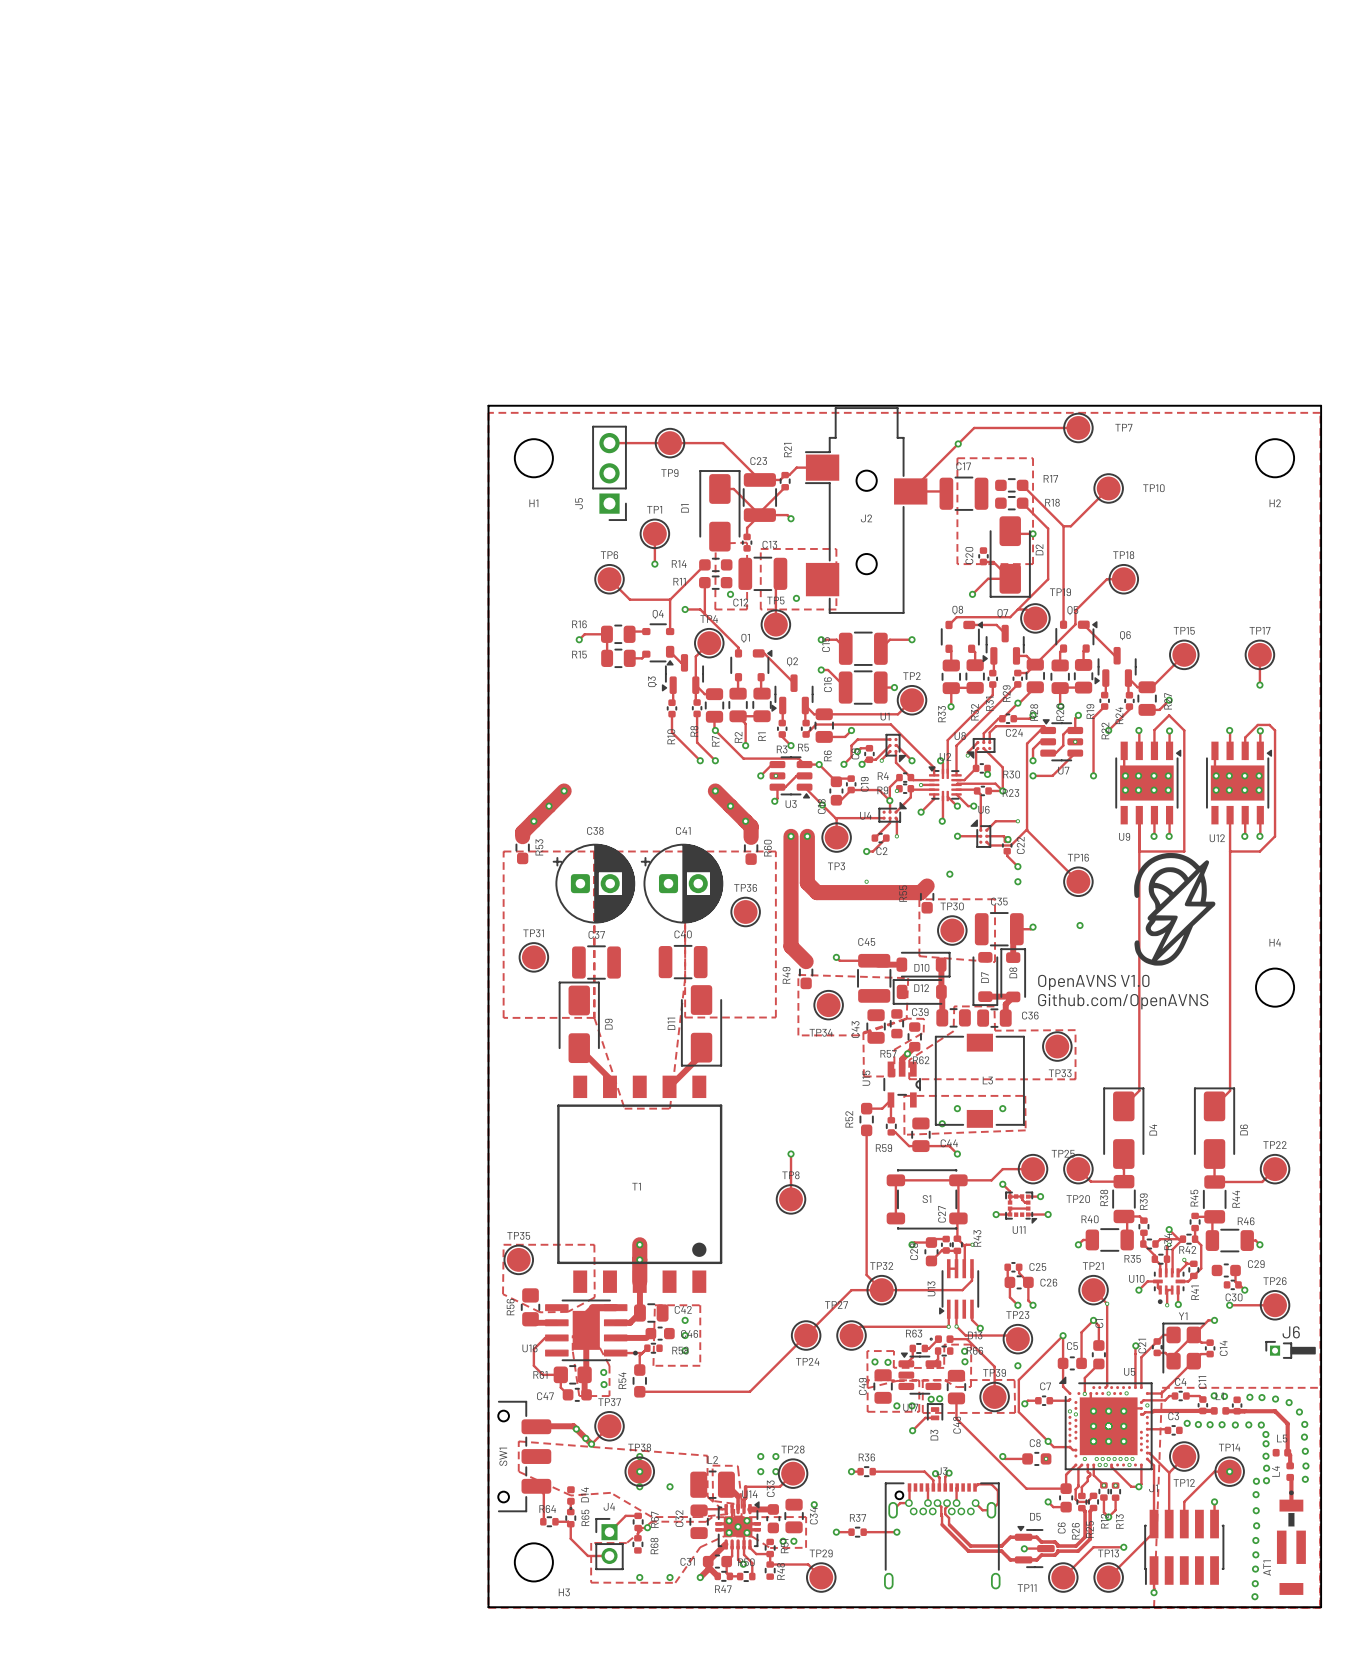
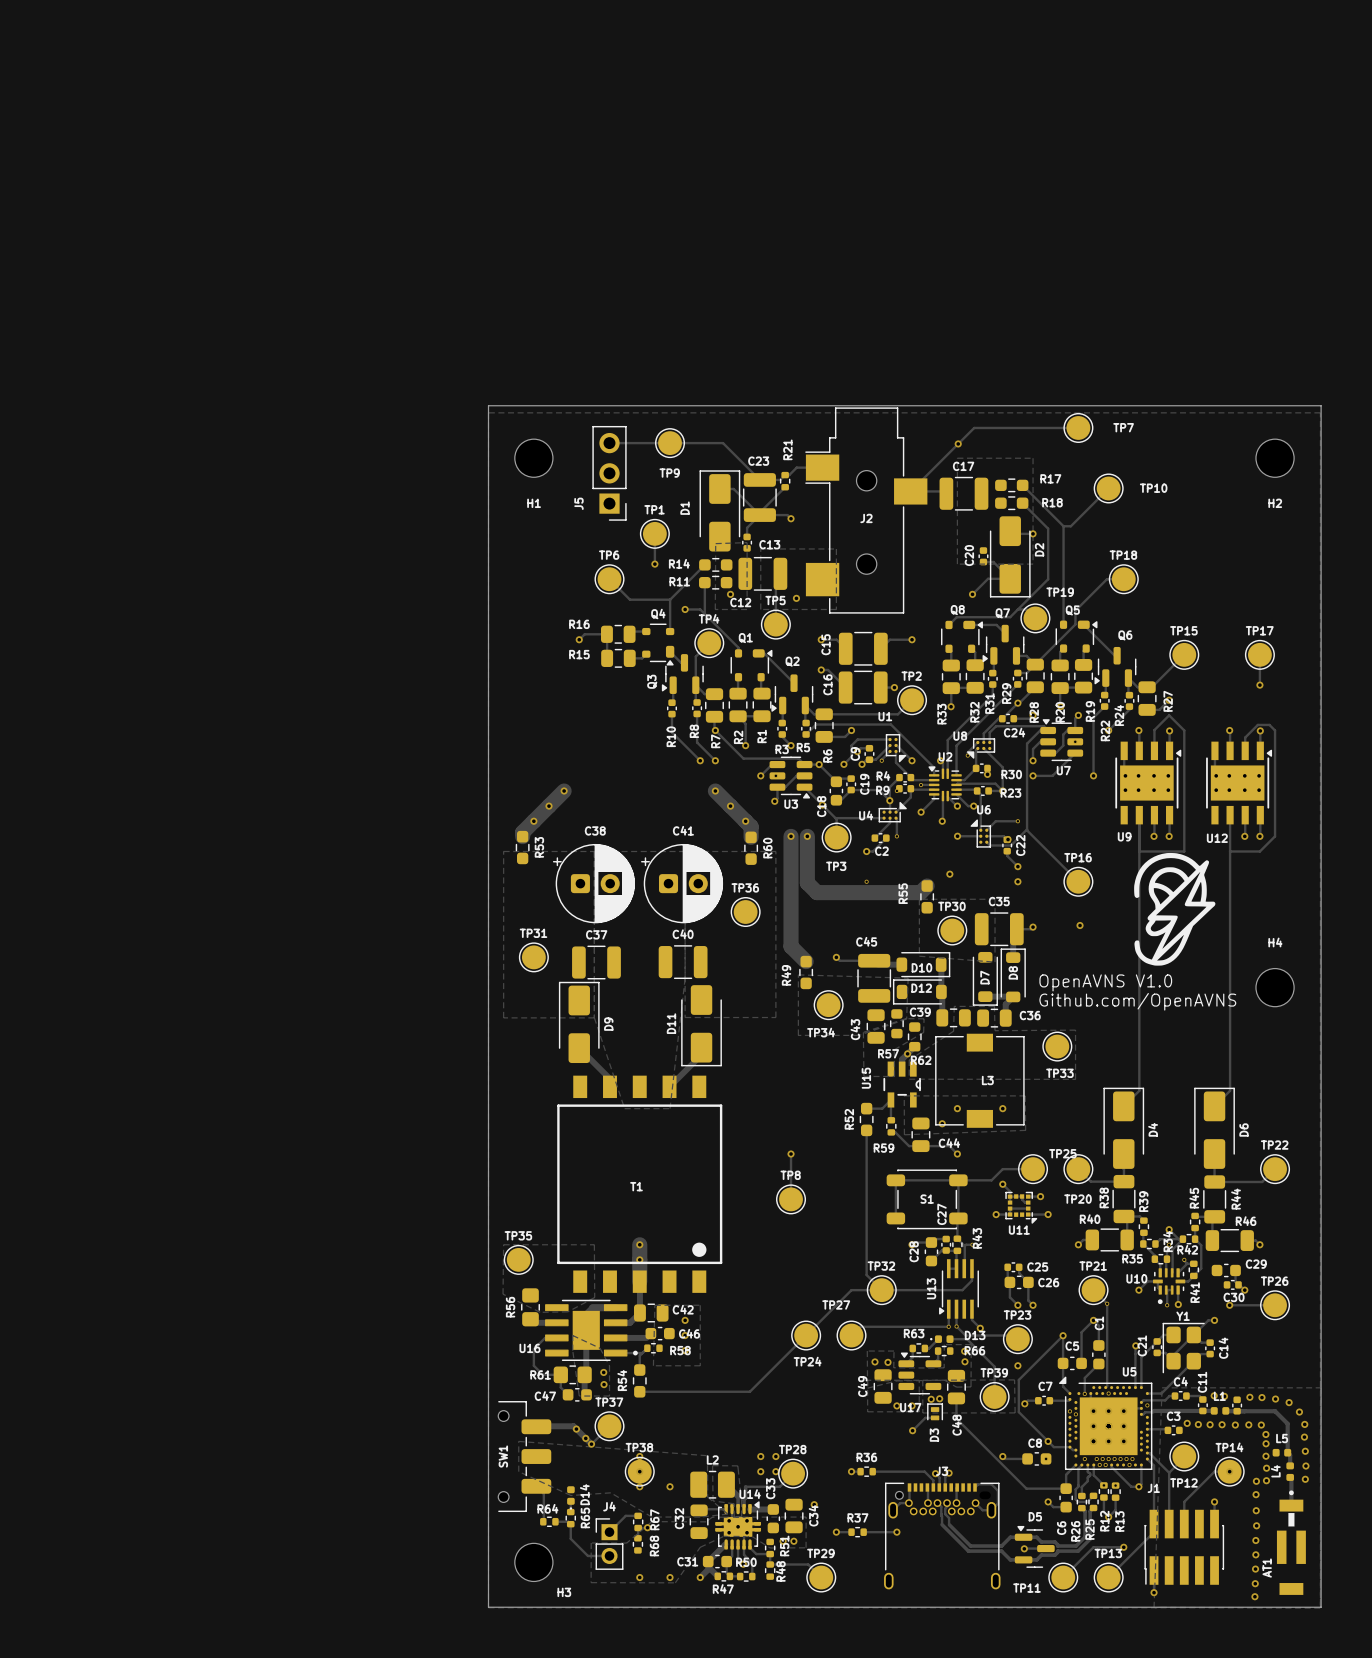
J6: (1290, 1349) -> none
via: (1126, 1393) -> none

